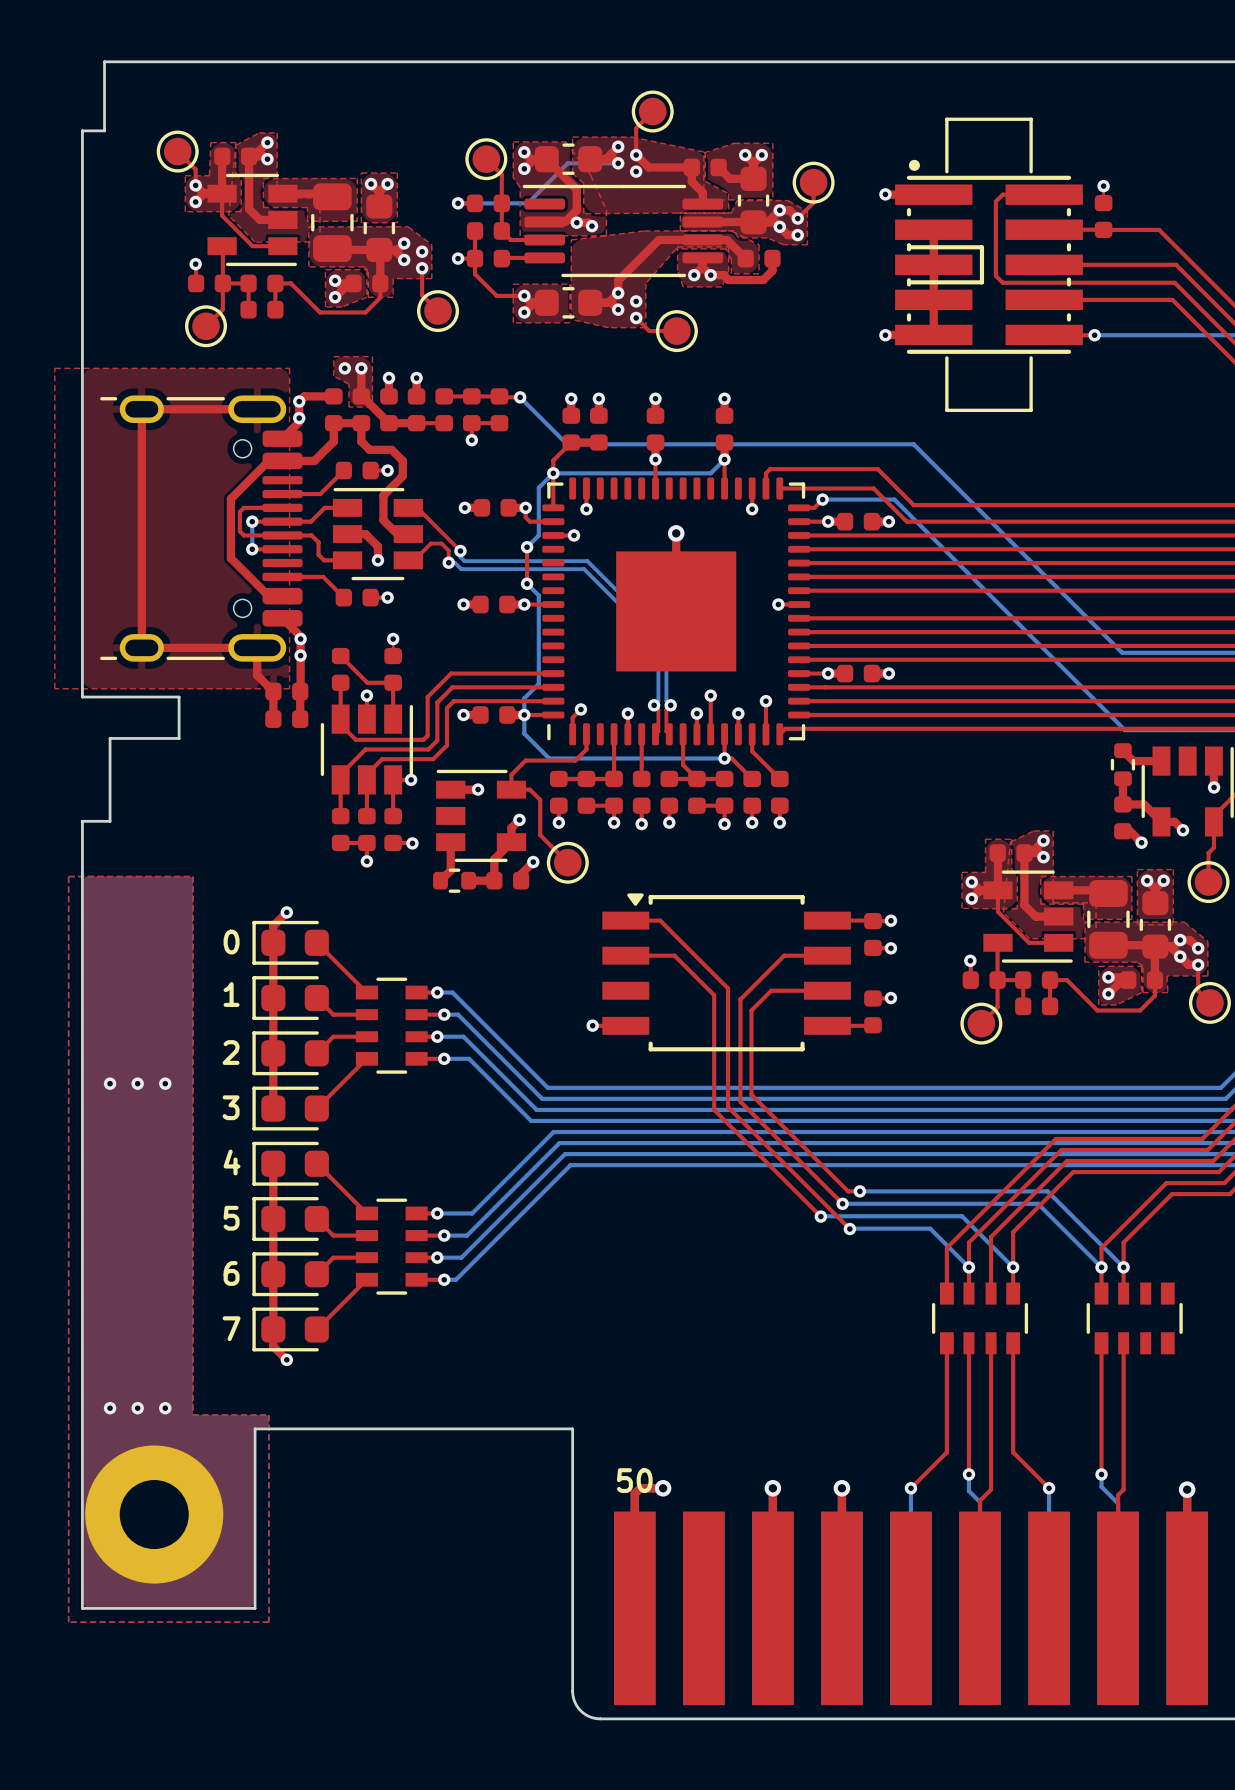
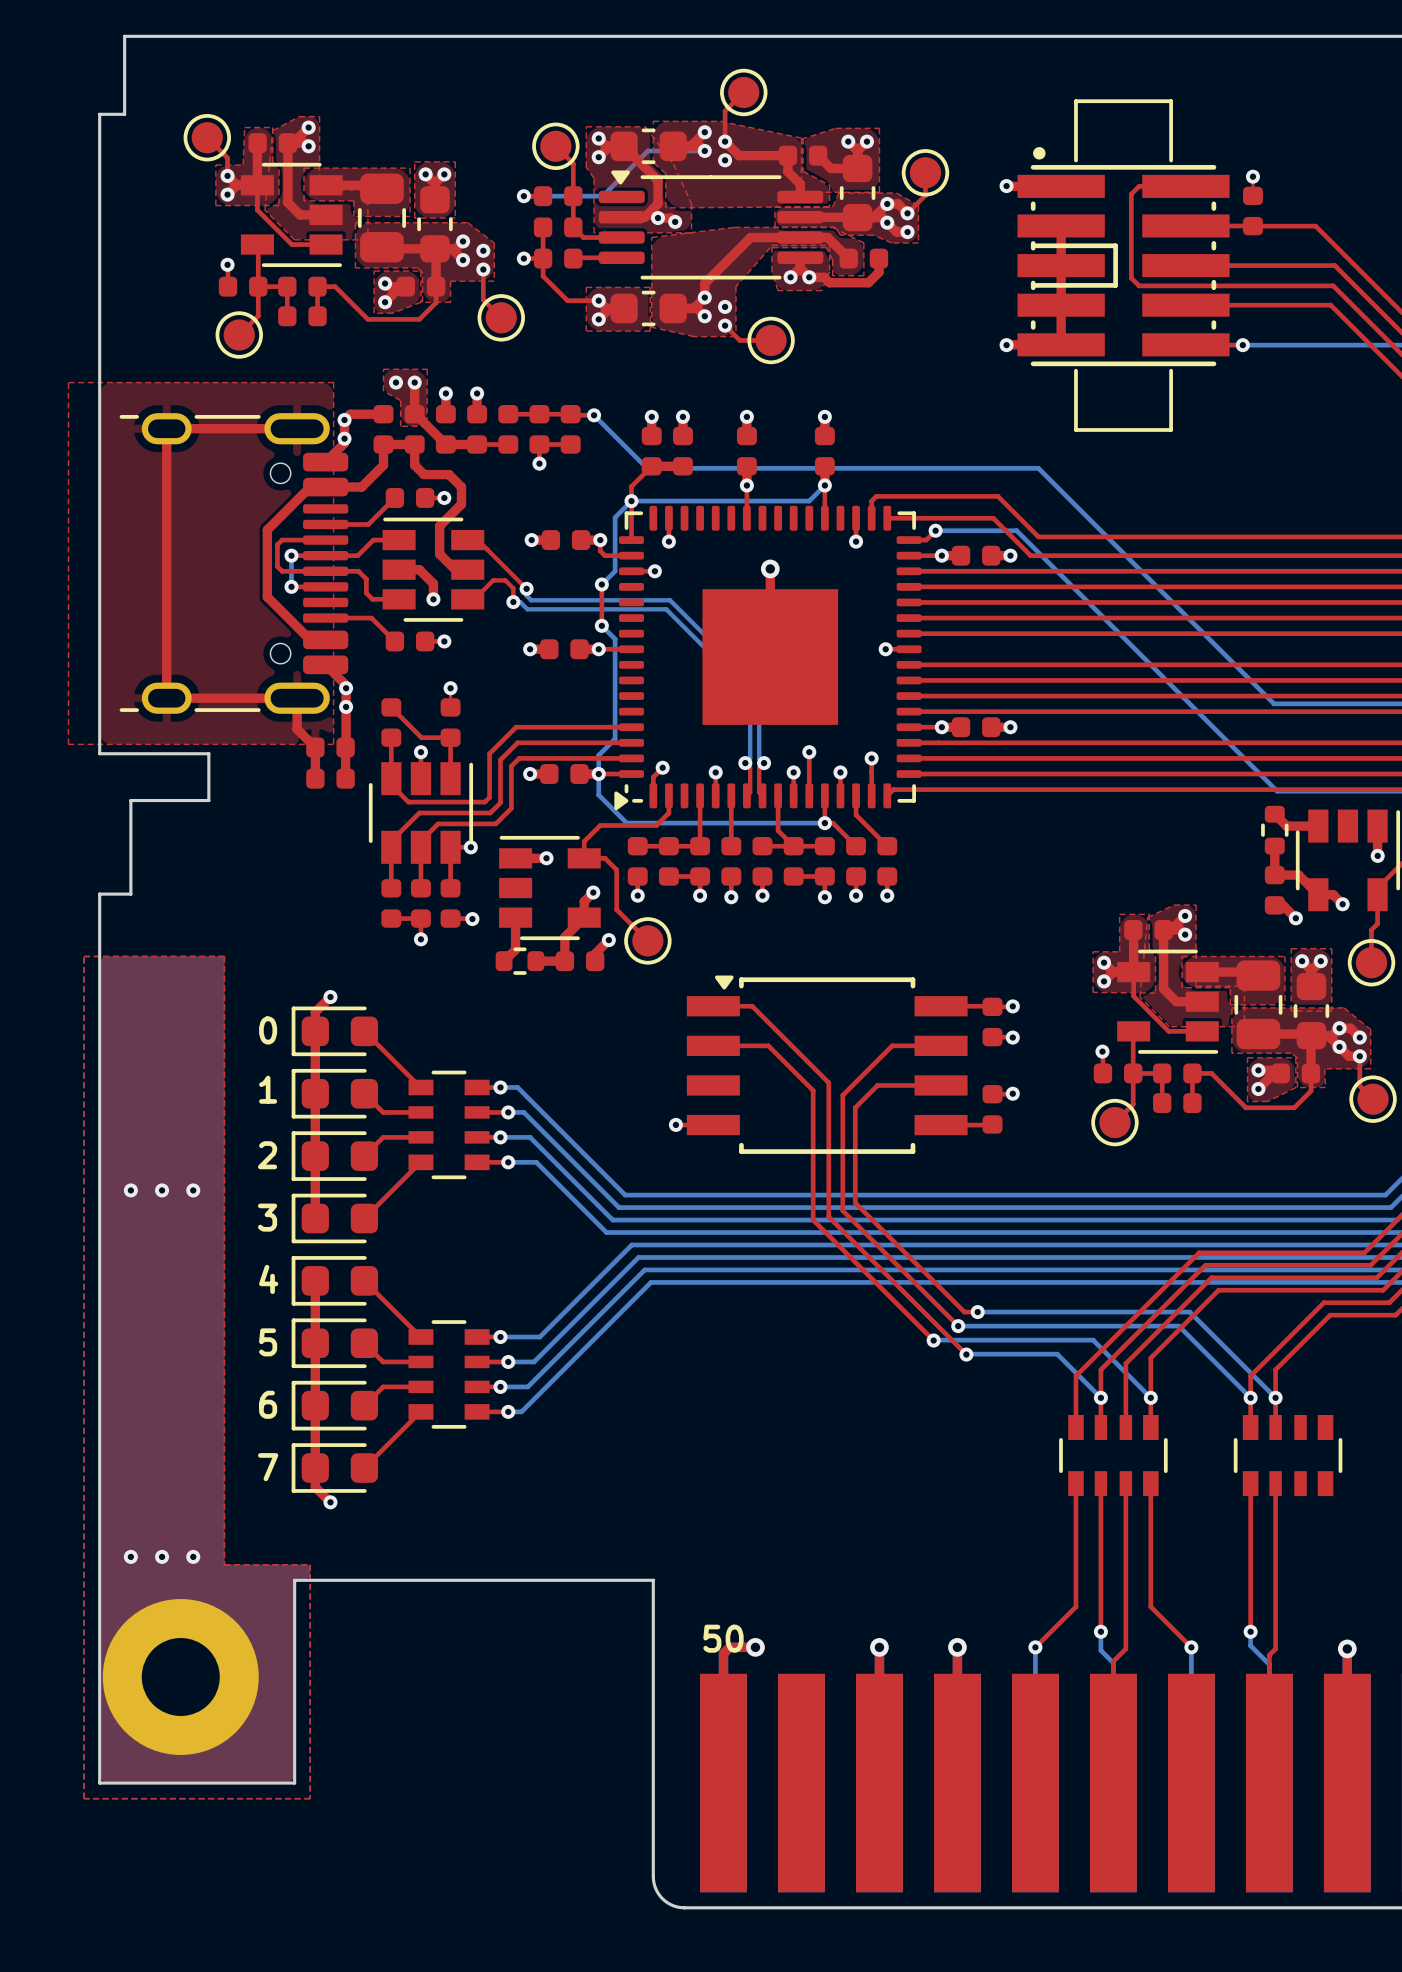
part footprint: [522, 184, 724, 278] -> [598, 170, 824, 280]
part footprint: [542, 477, 811, 746] -> [614, 505, 922, 811]

